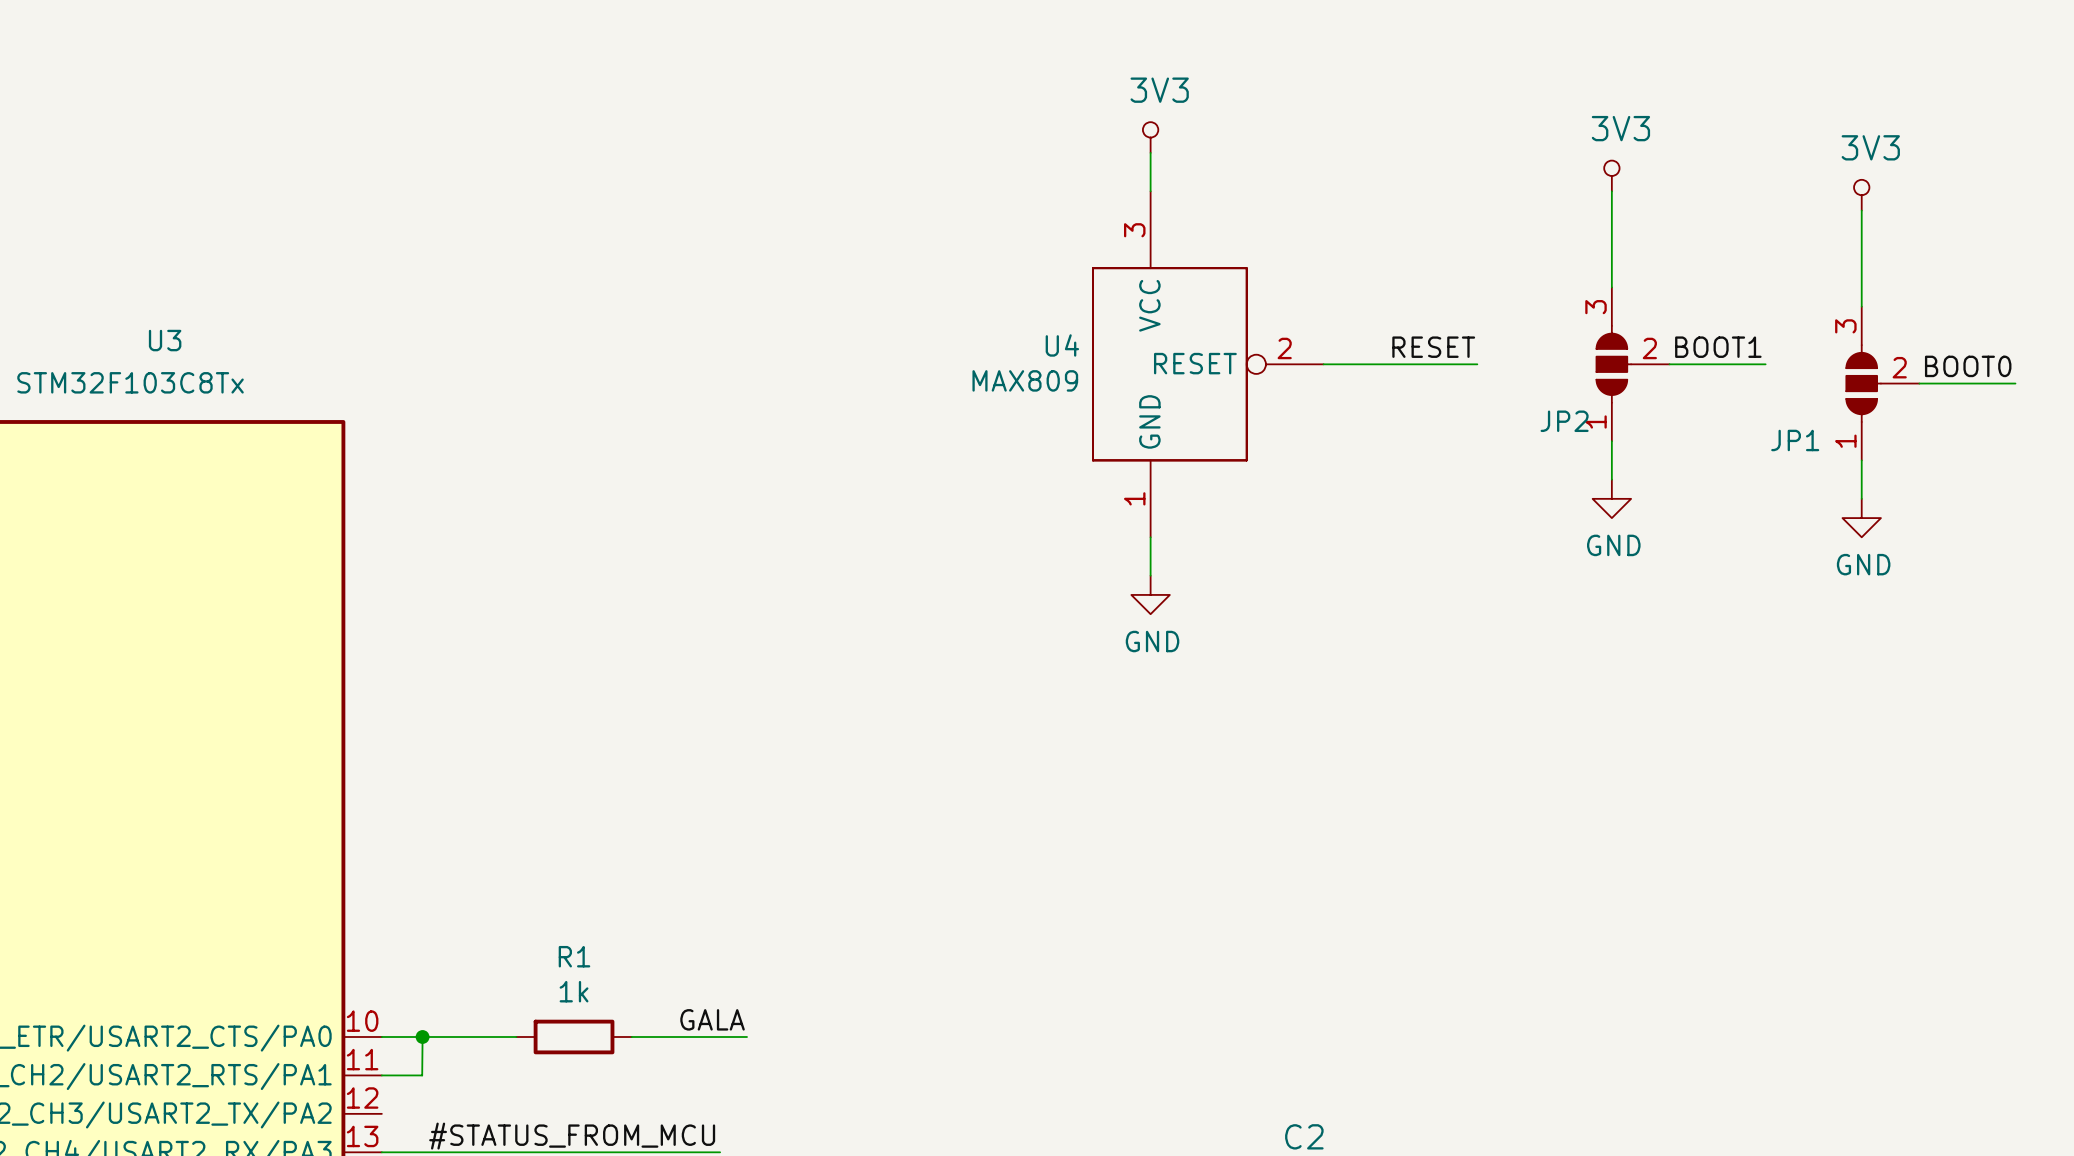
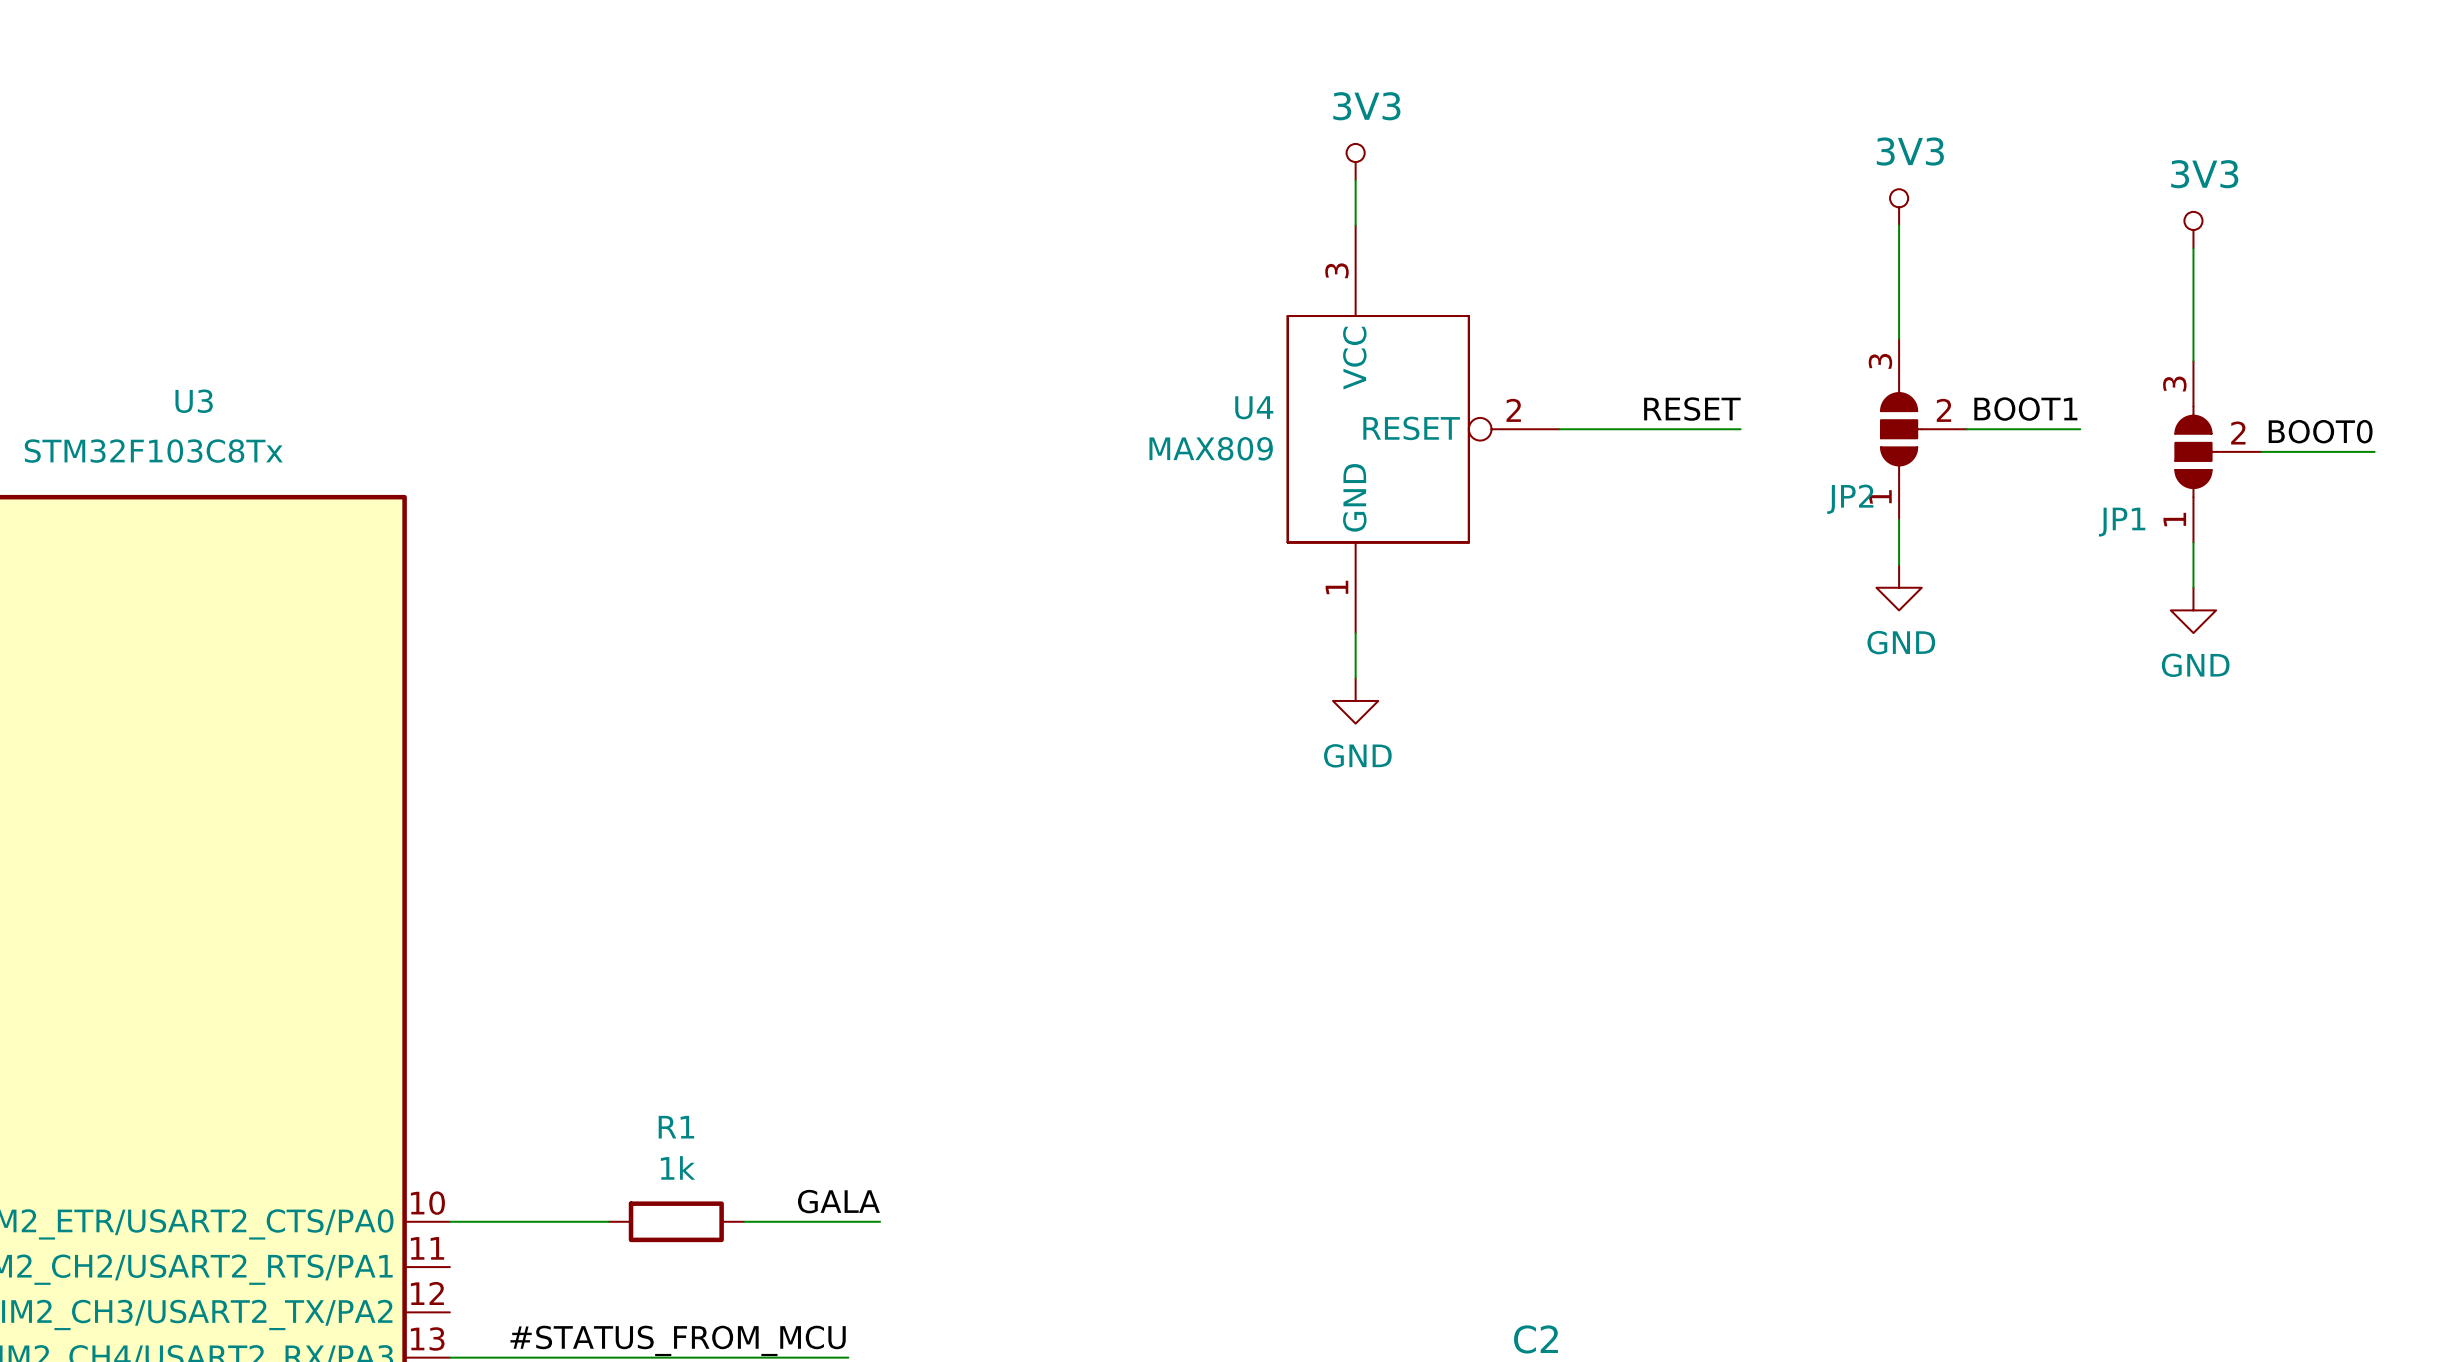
wire: (422, 1036) (422, 1075) (381, 1075) -> none
junction: (422, 1036) -> none

